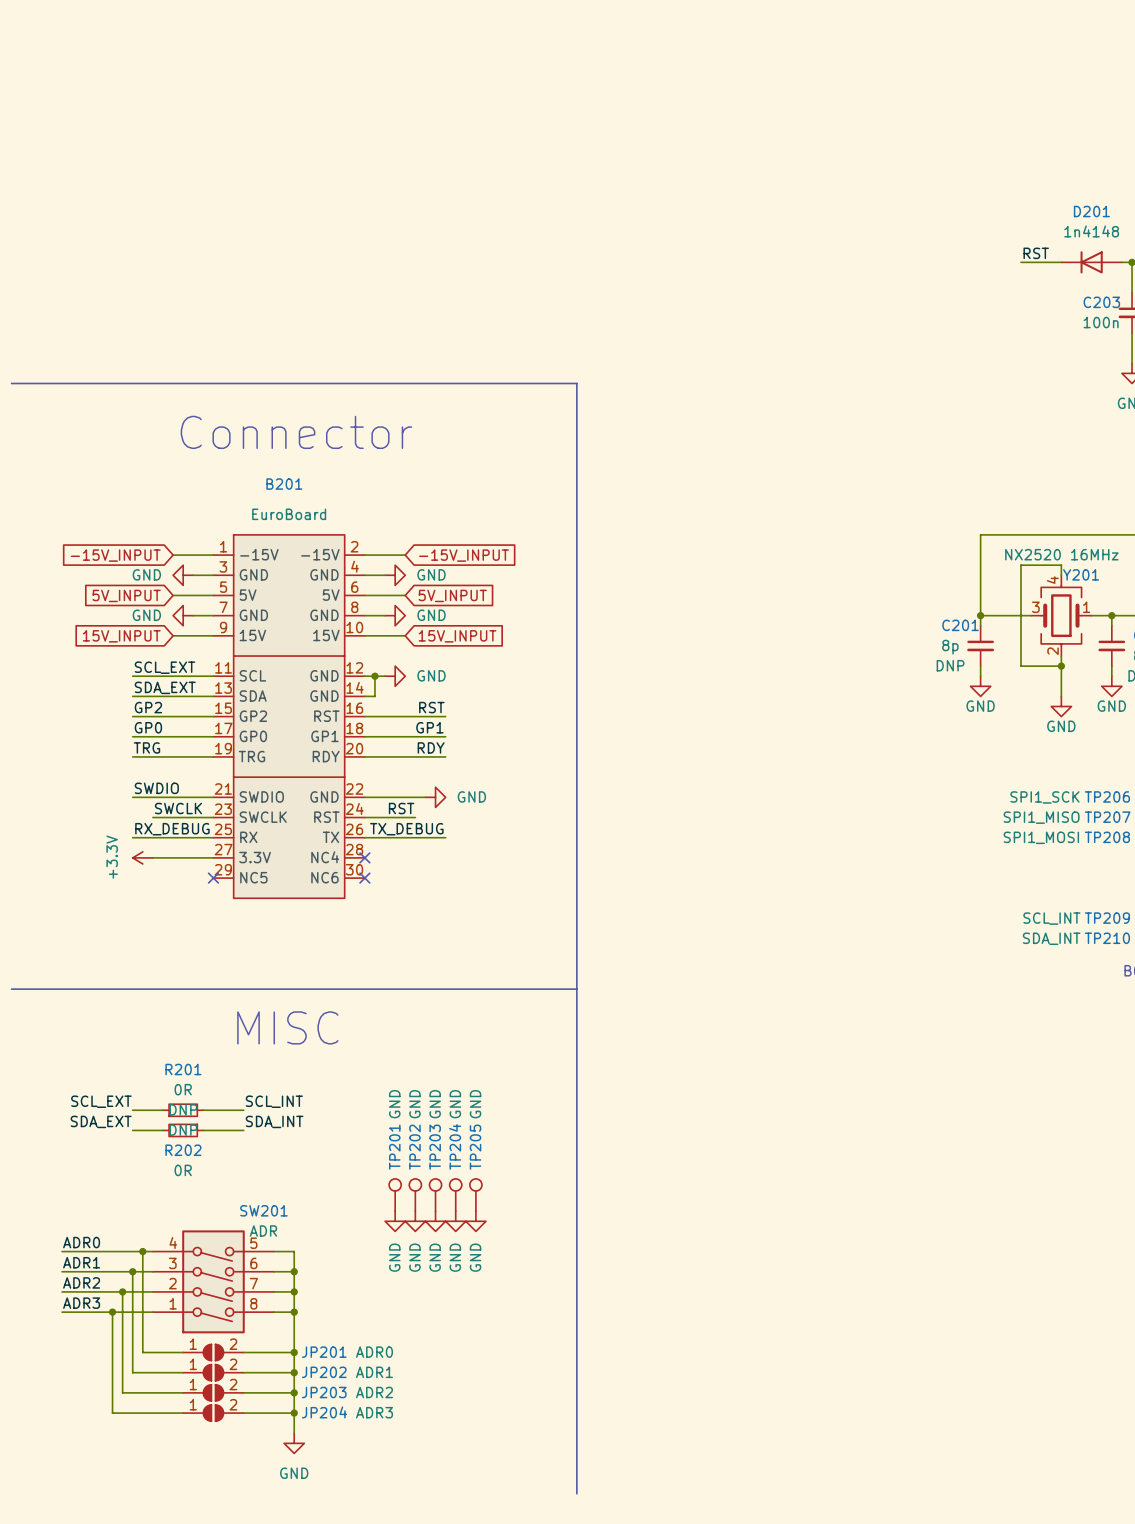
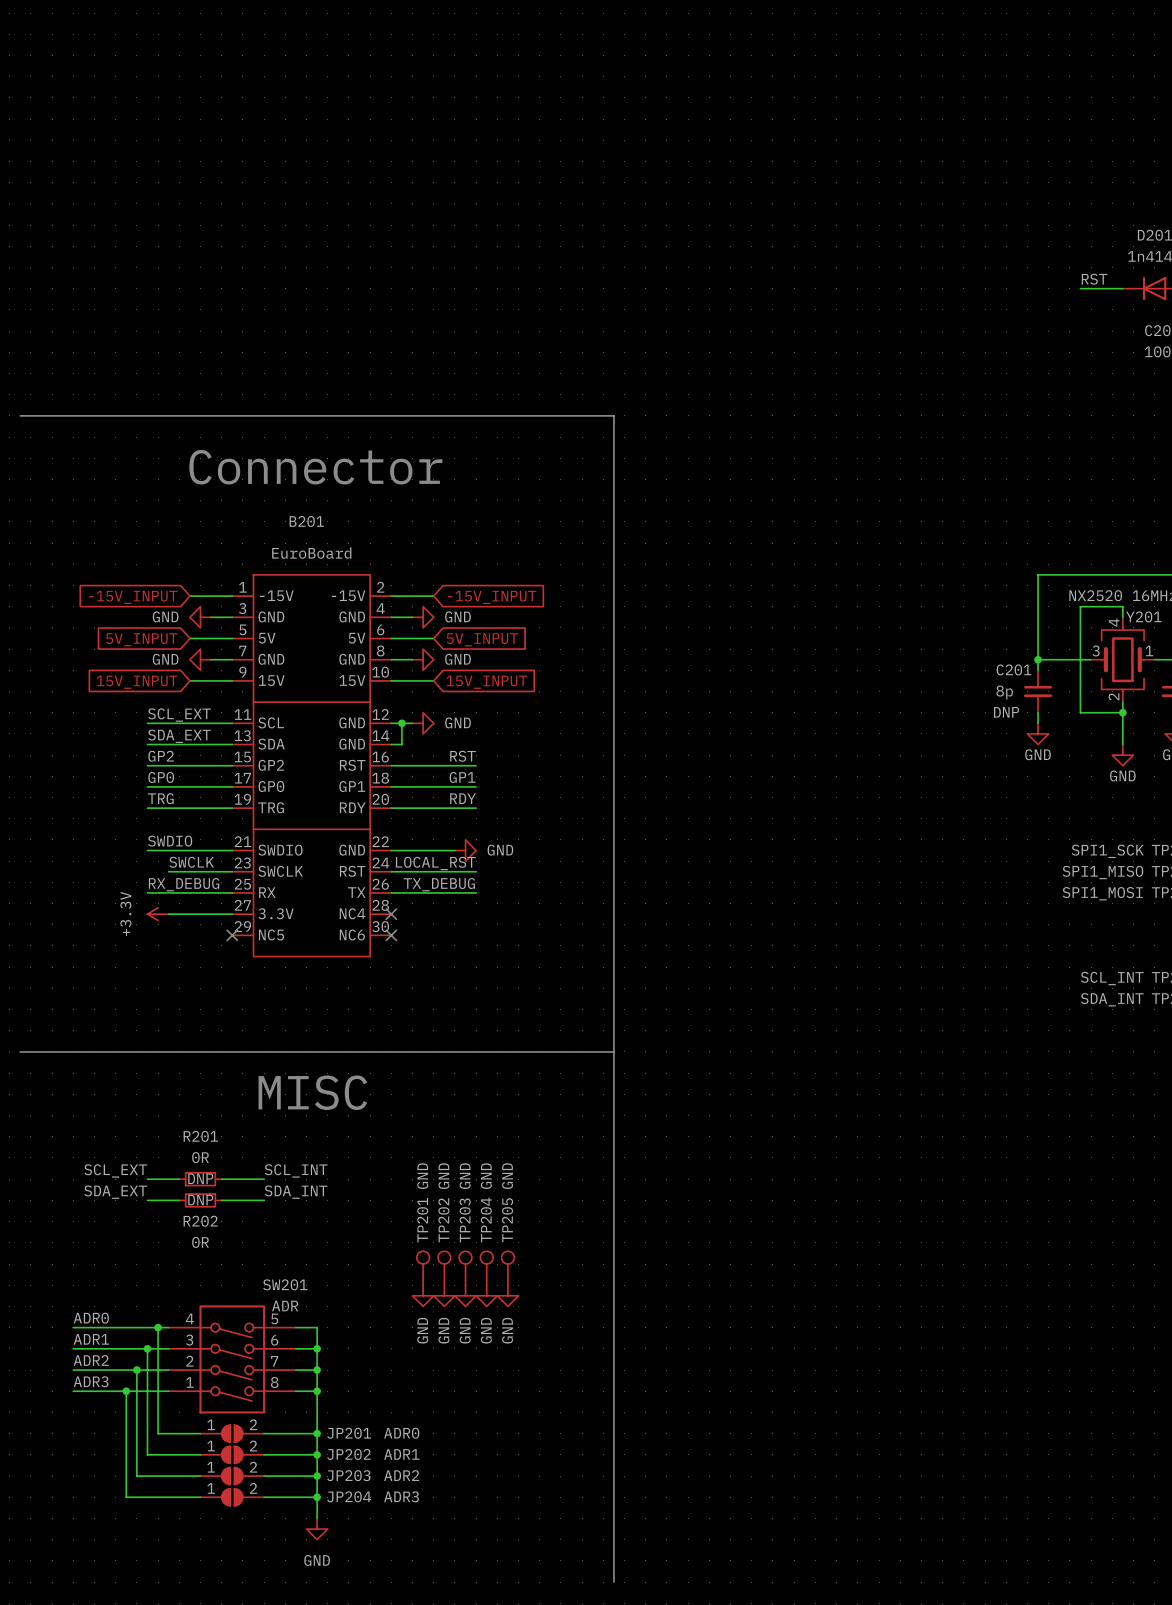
label: RST (401, 808) -> none
label: none -> LOCAL_RST (435, 863)
wire: none -> (444, 871) (476, 871)

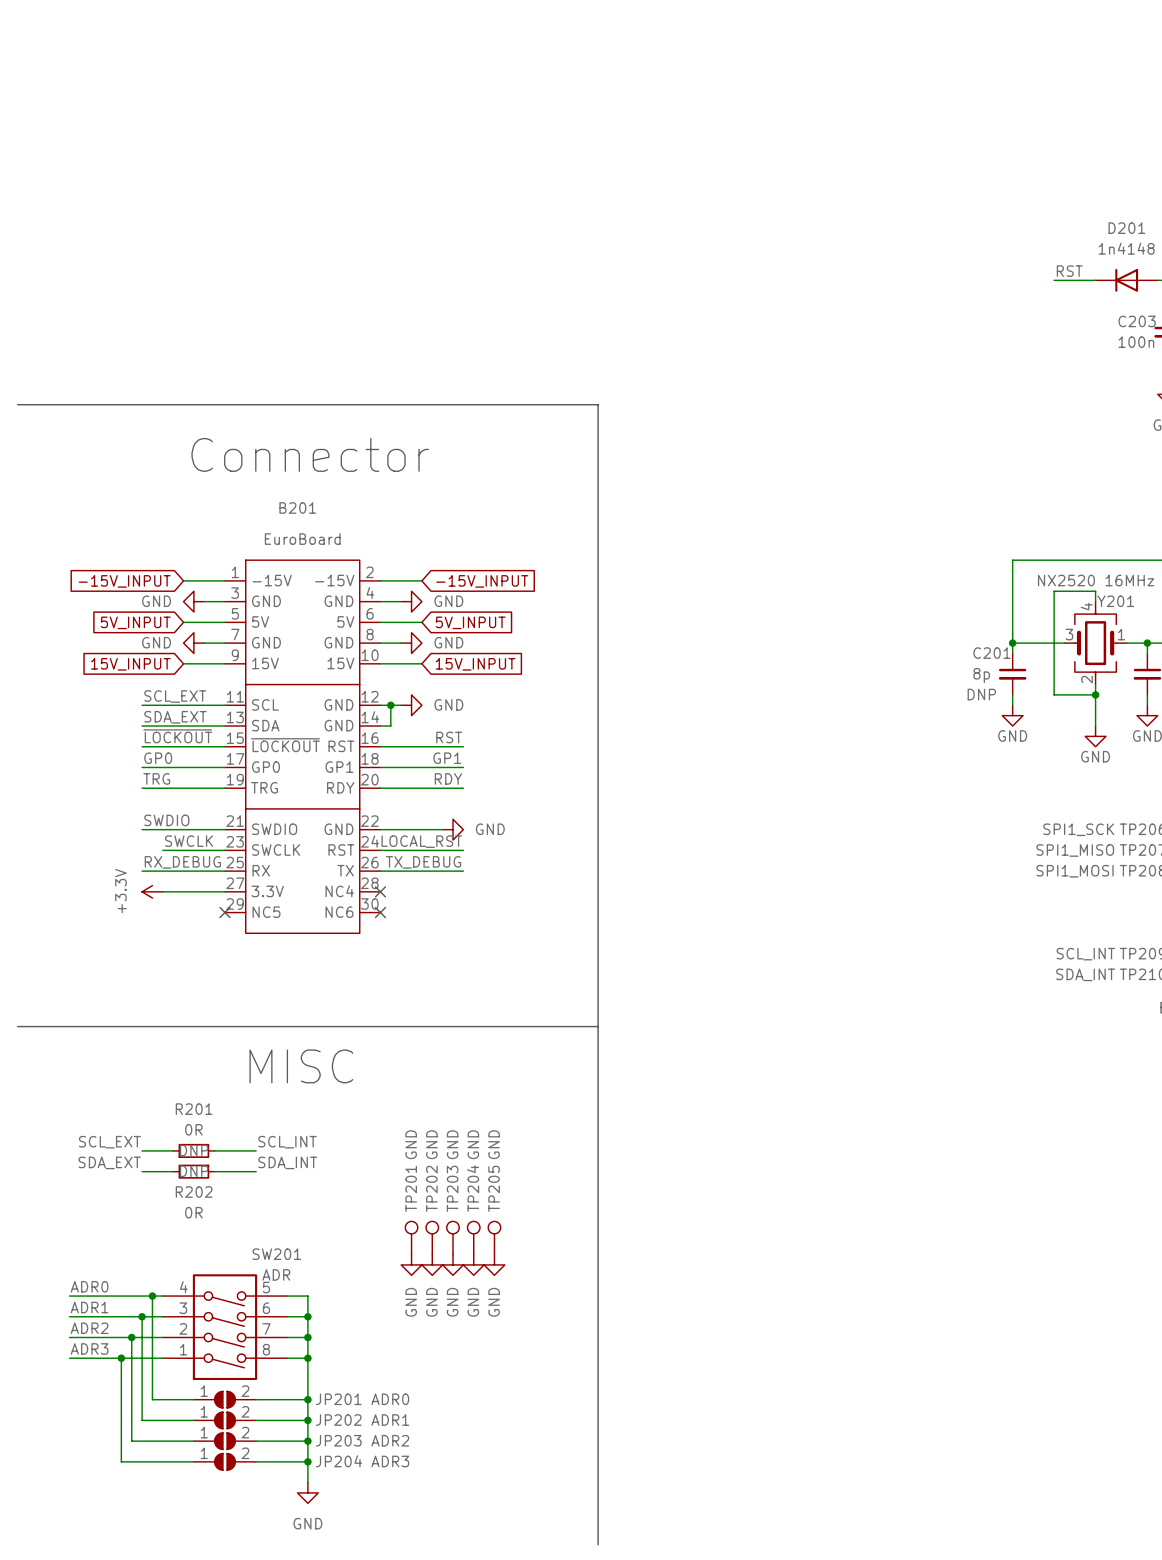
label: GP2 (161, 756) -> ~{LOCKOUT} (177, 736)
B201 pin name: GP2 (271, 765) -> ~{LOCKOUT} (285, 745)

